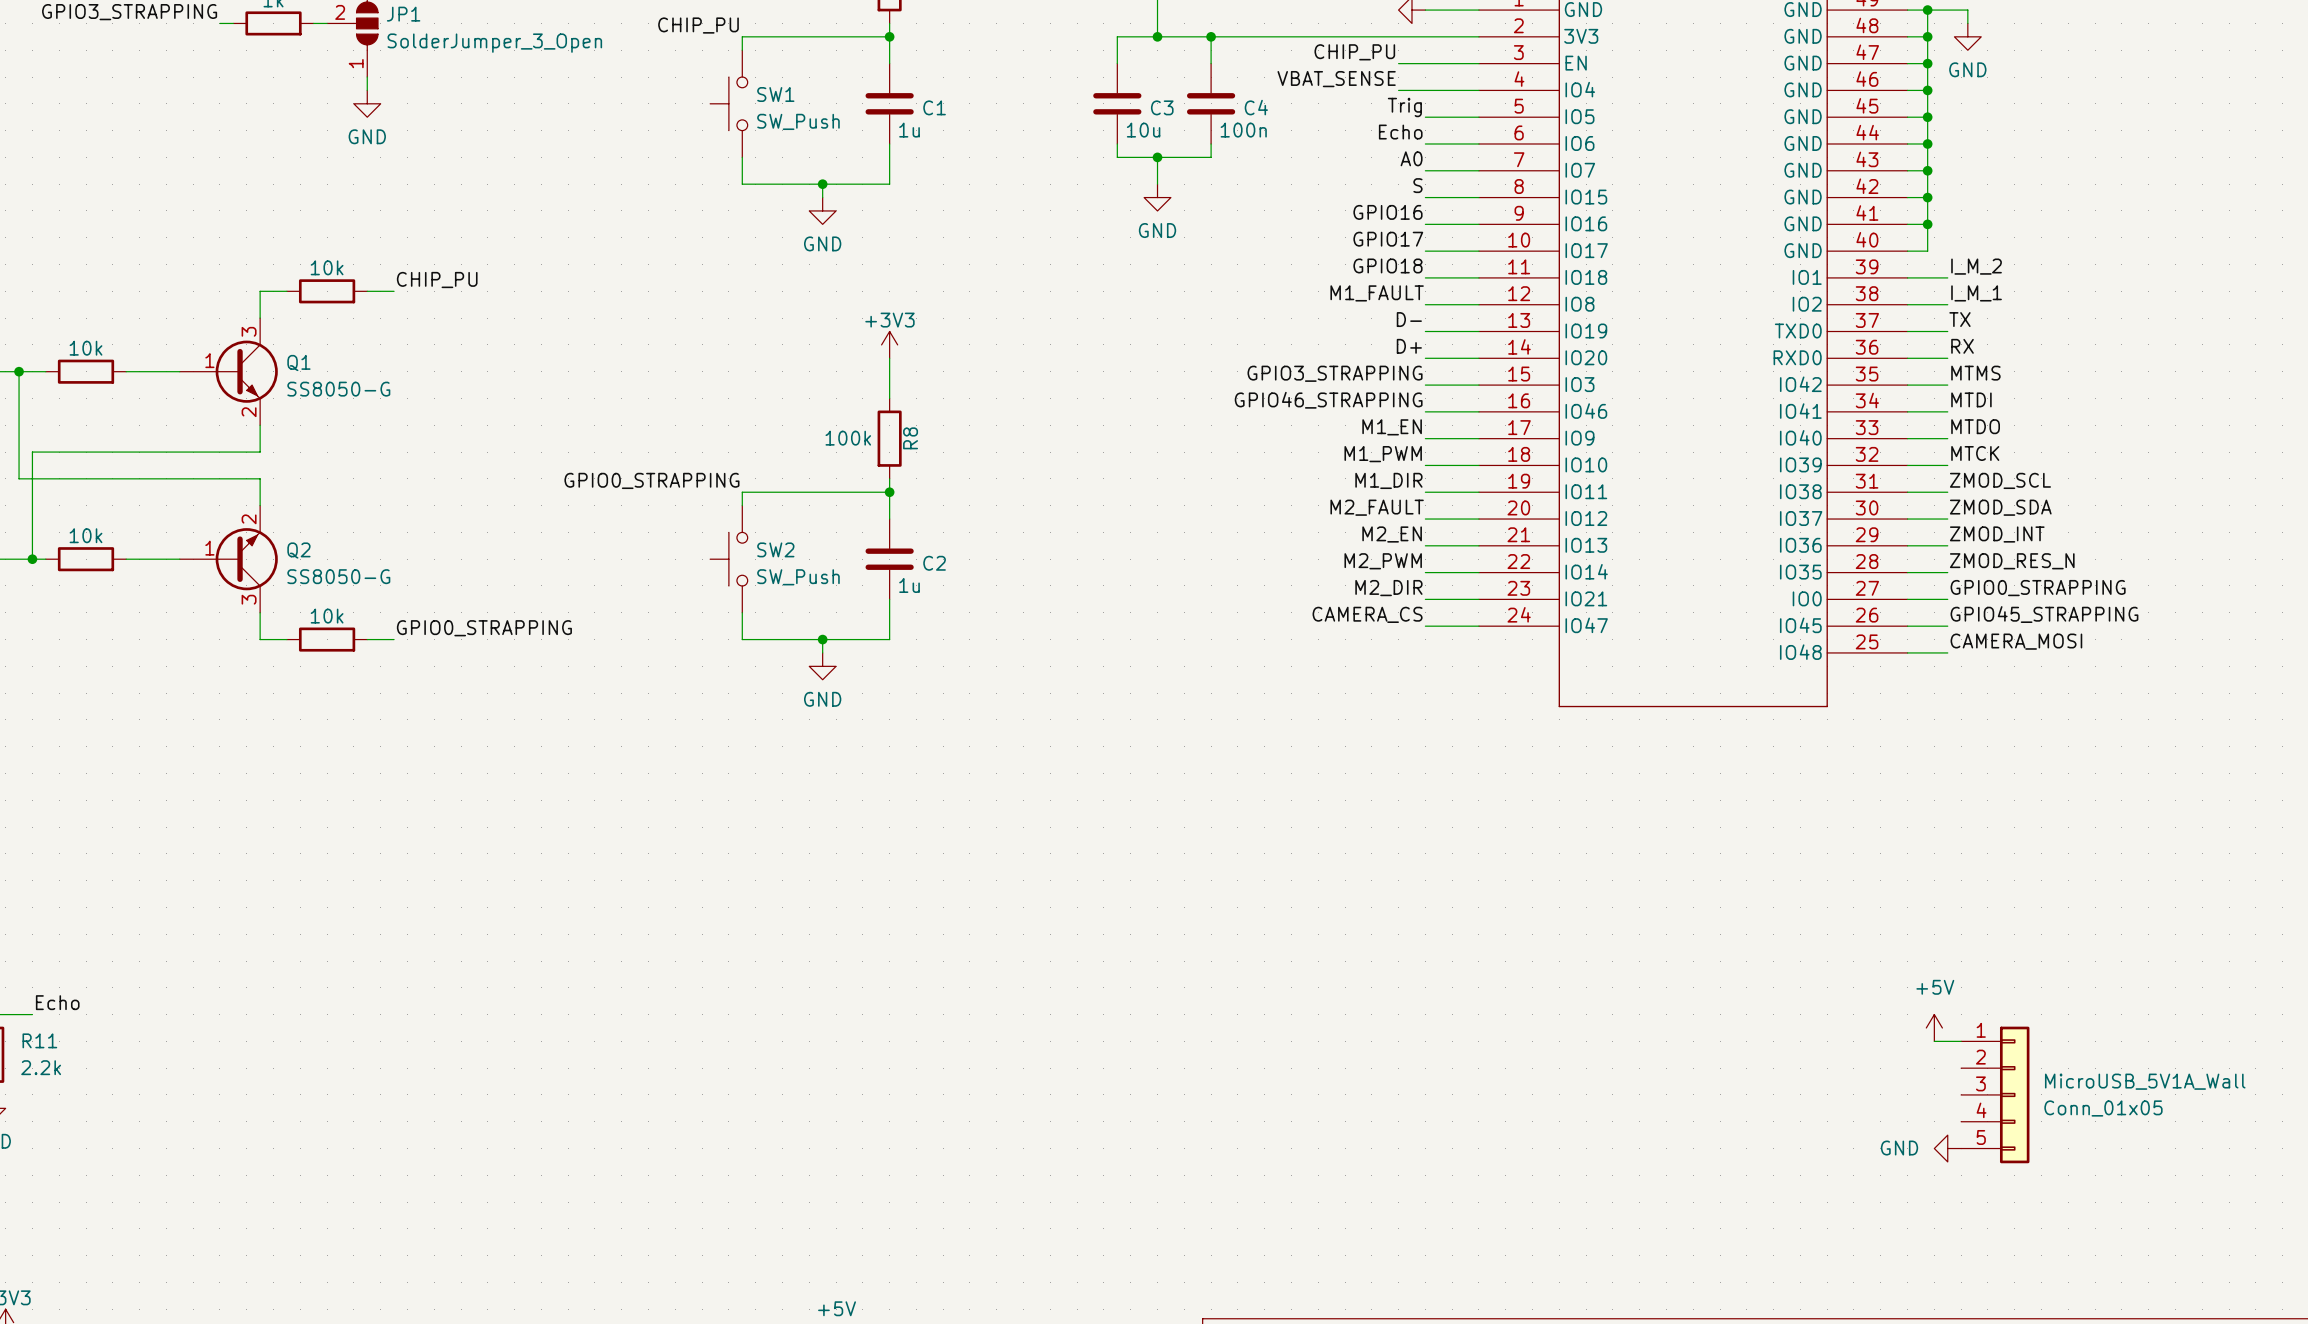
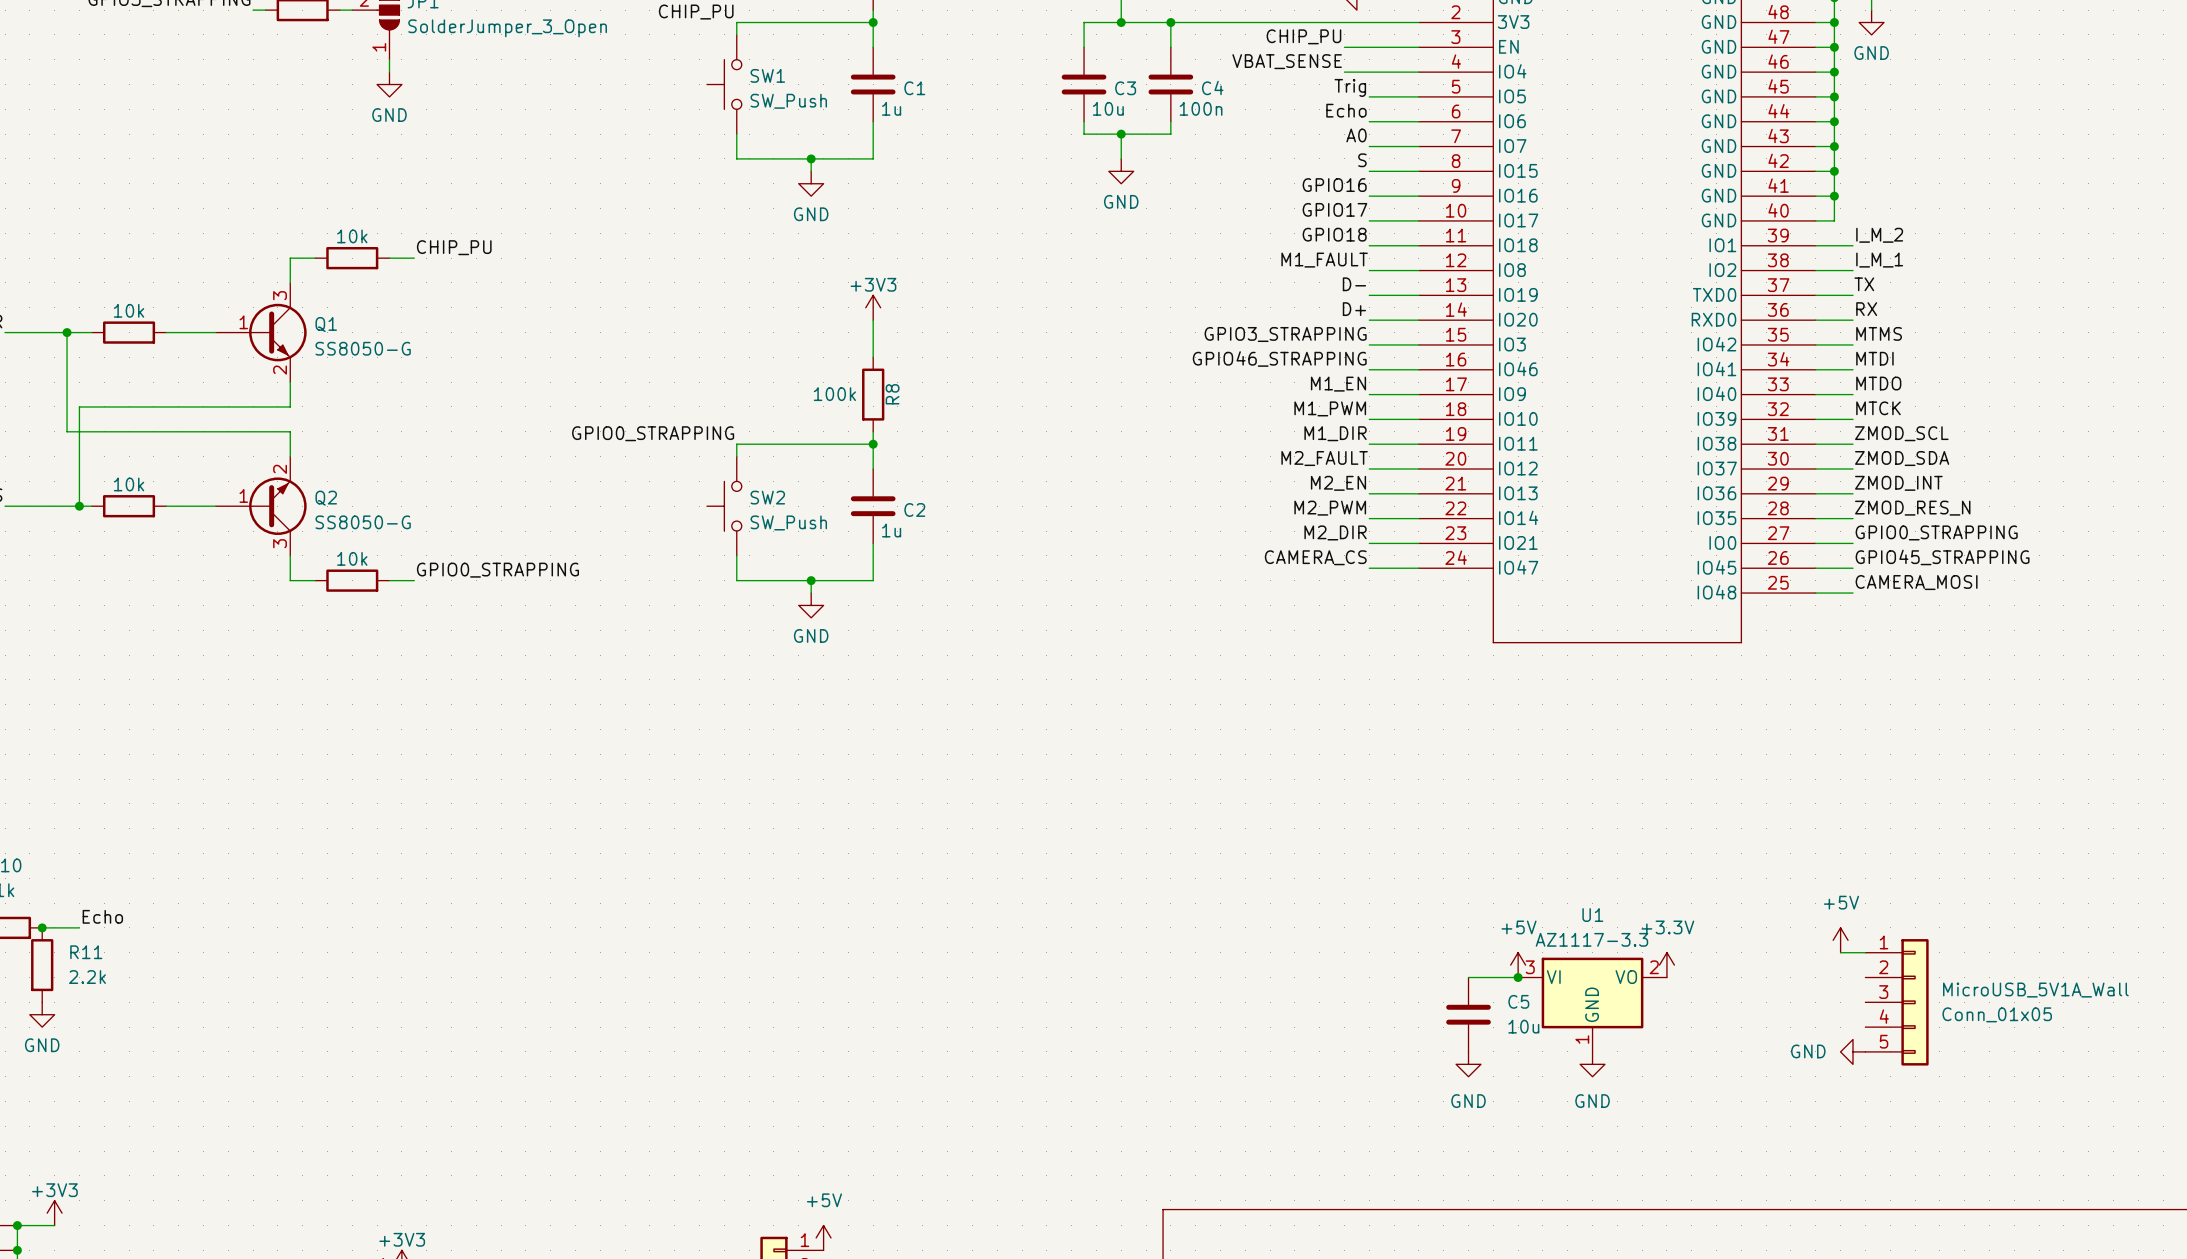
power symbol: none -> +5V (1518, 965)
power symbol: none -> +3.3V (1666, 965)
wire: none -> (1468, 977) (1518, 977)
junction: none -> (1518, 977)
U1: none -> AZ1117-3.3 (1592, 1004)
C5: none -> 10u (1468, 1014)
power symbol: none -> GND (1468, 1064)
power symbol: none -> GND (1592, 1064)

